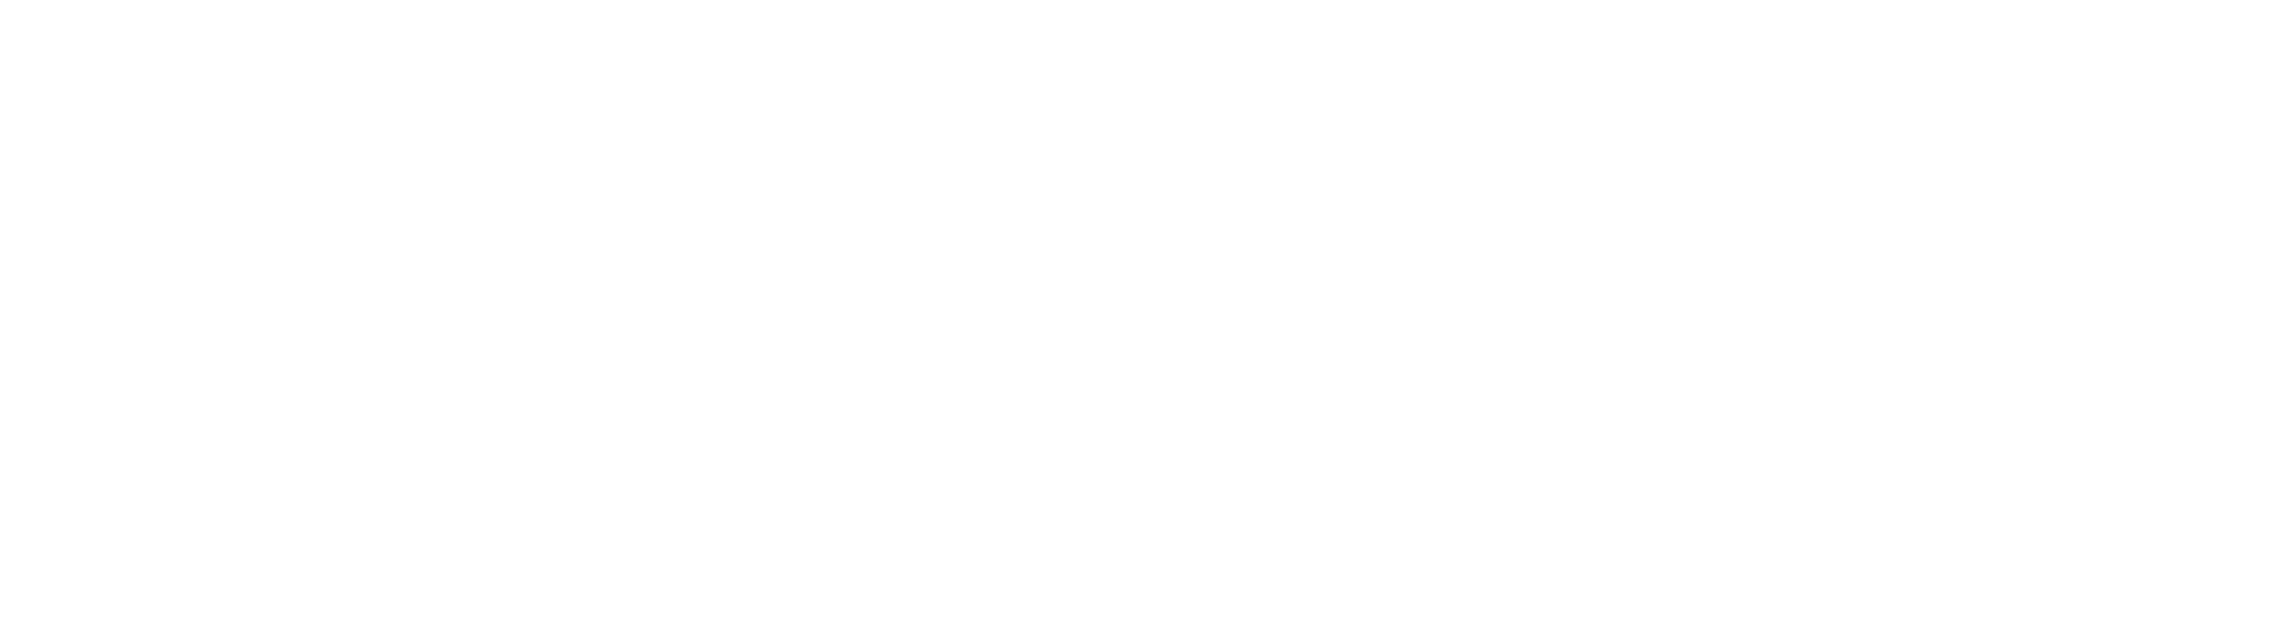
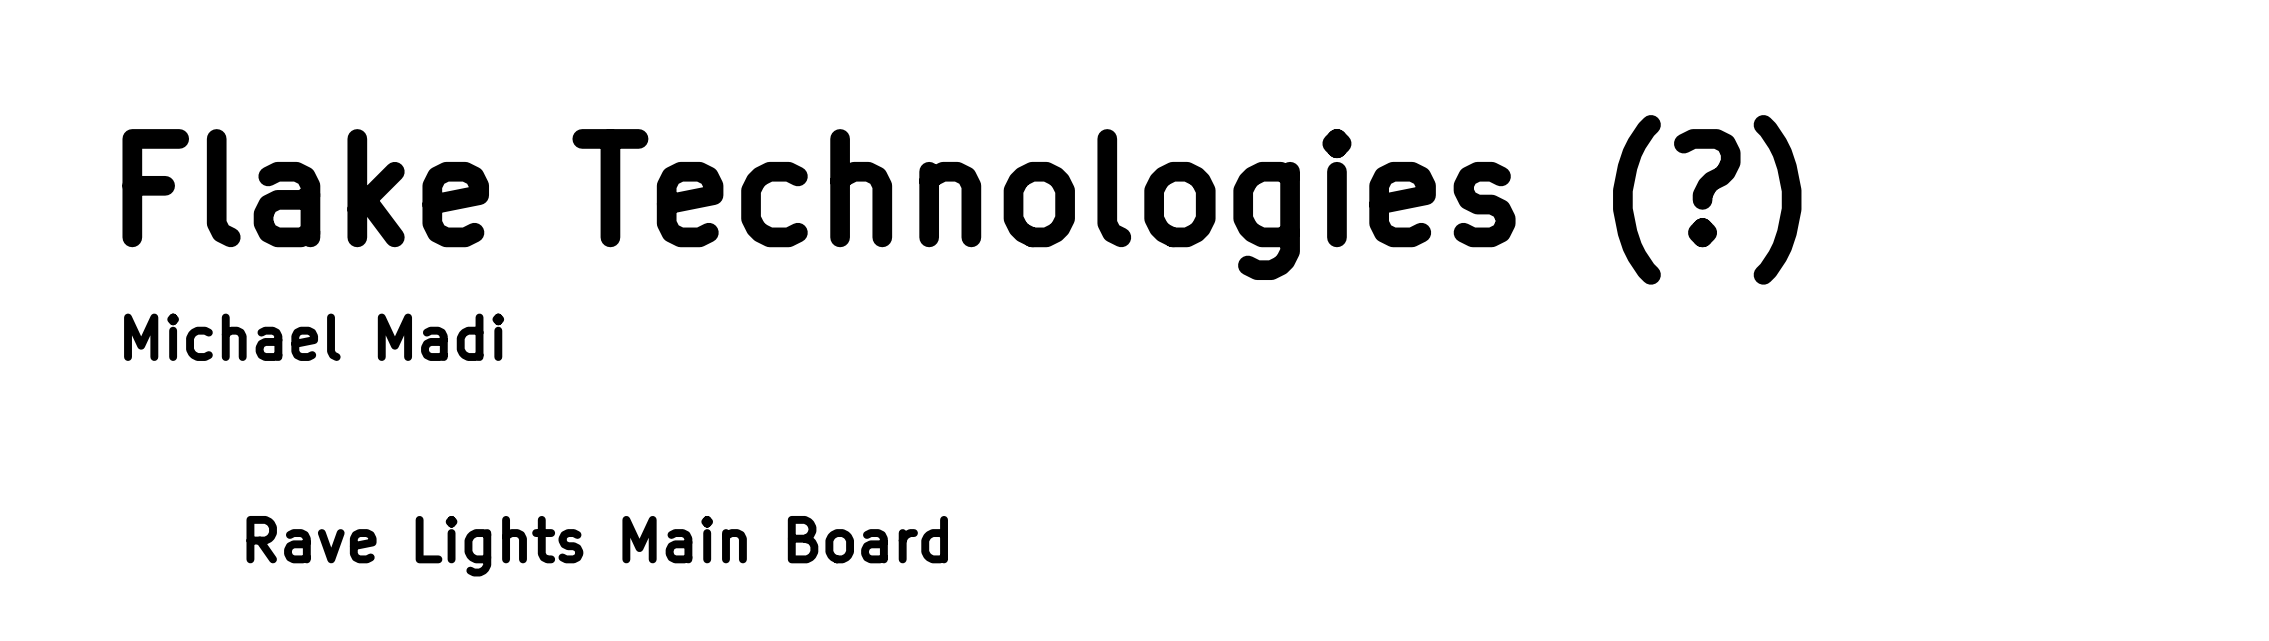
text: none -> Flake Technologies (?) (961, 199)
text: none -> Michael Madi (314, 337)
text: none -> Rave Lights Main Board (597, 546)

